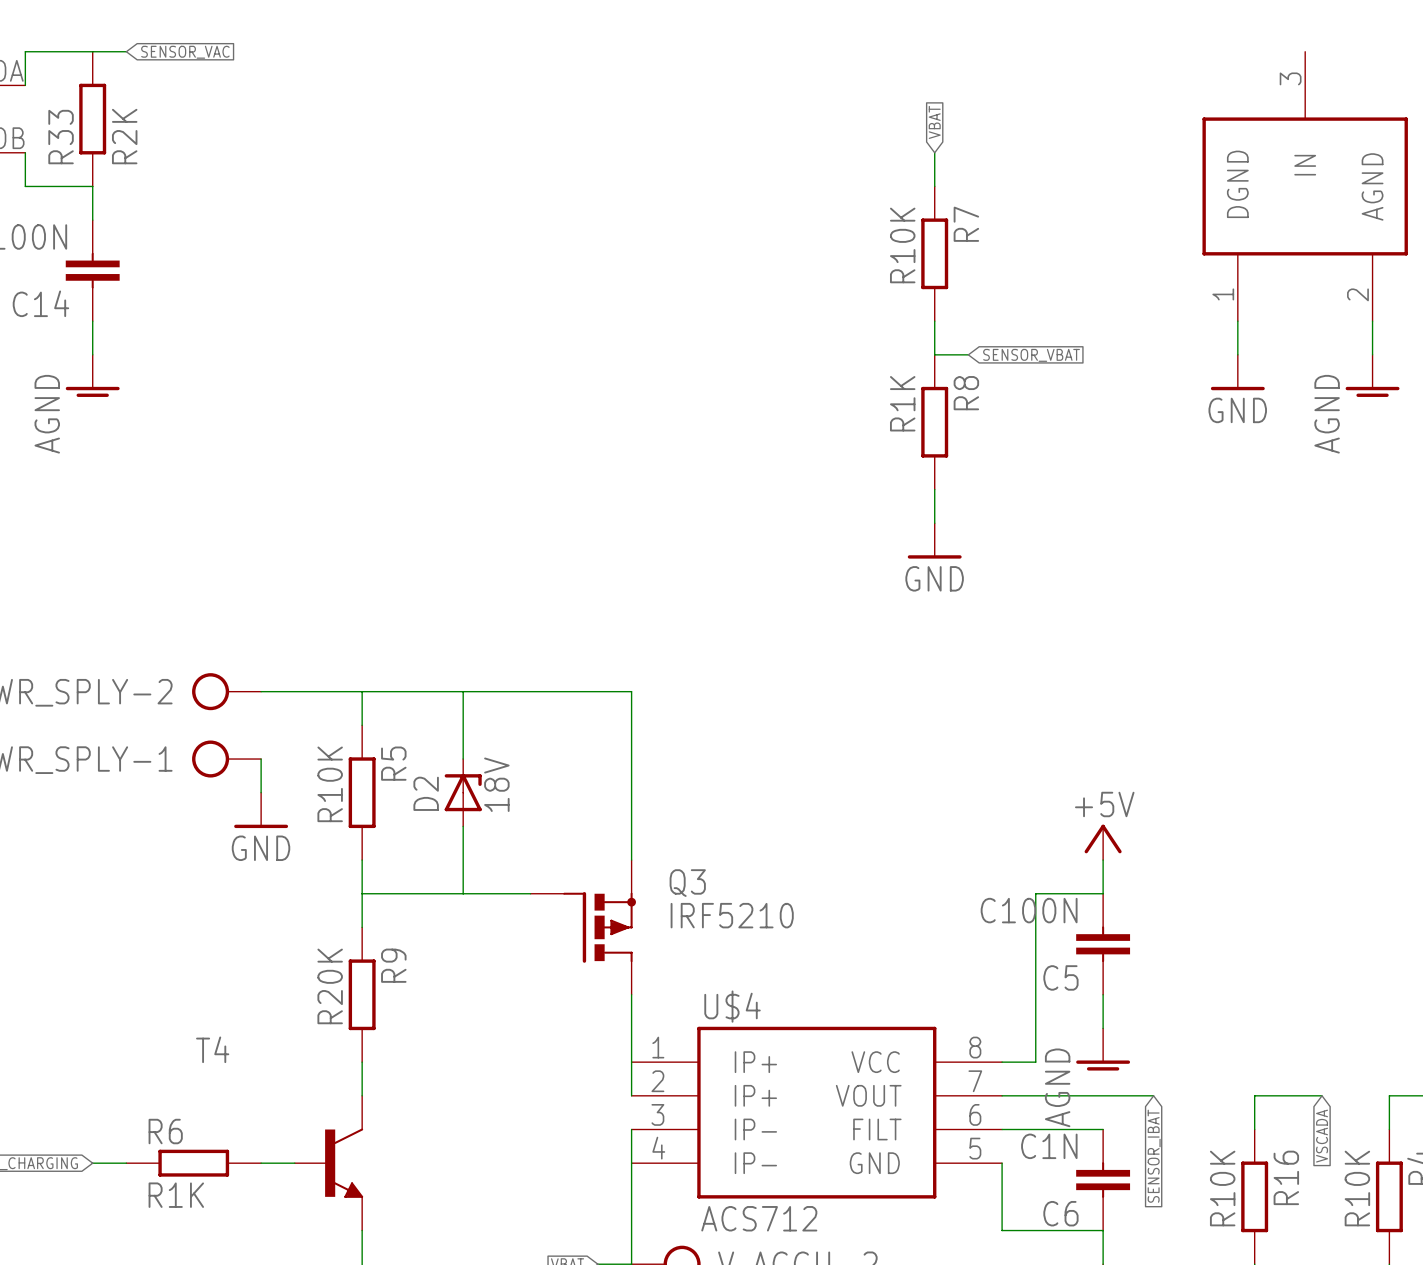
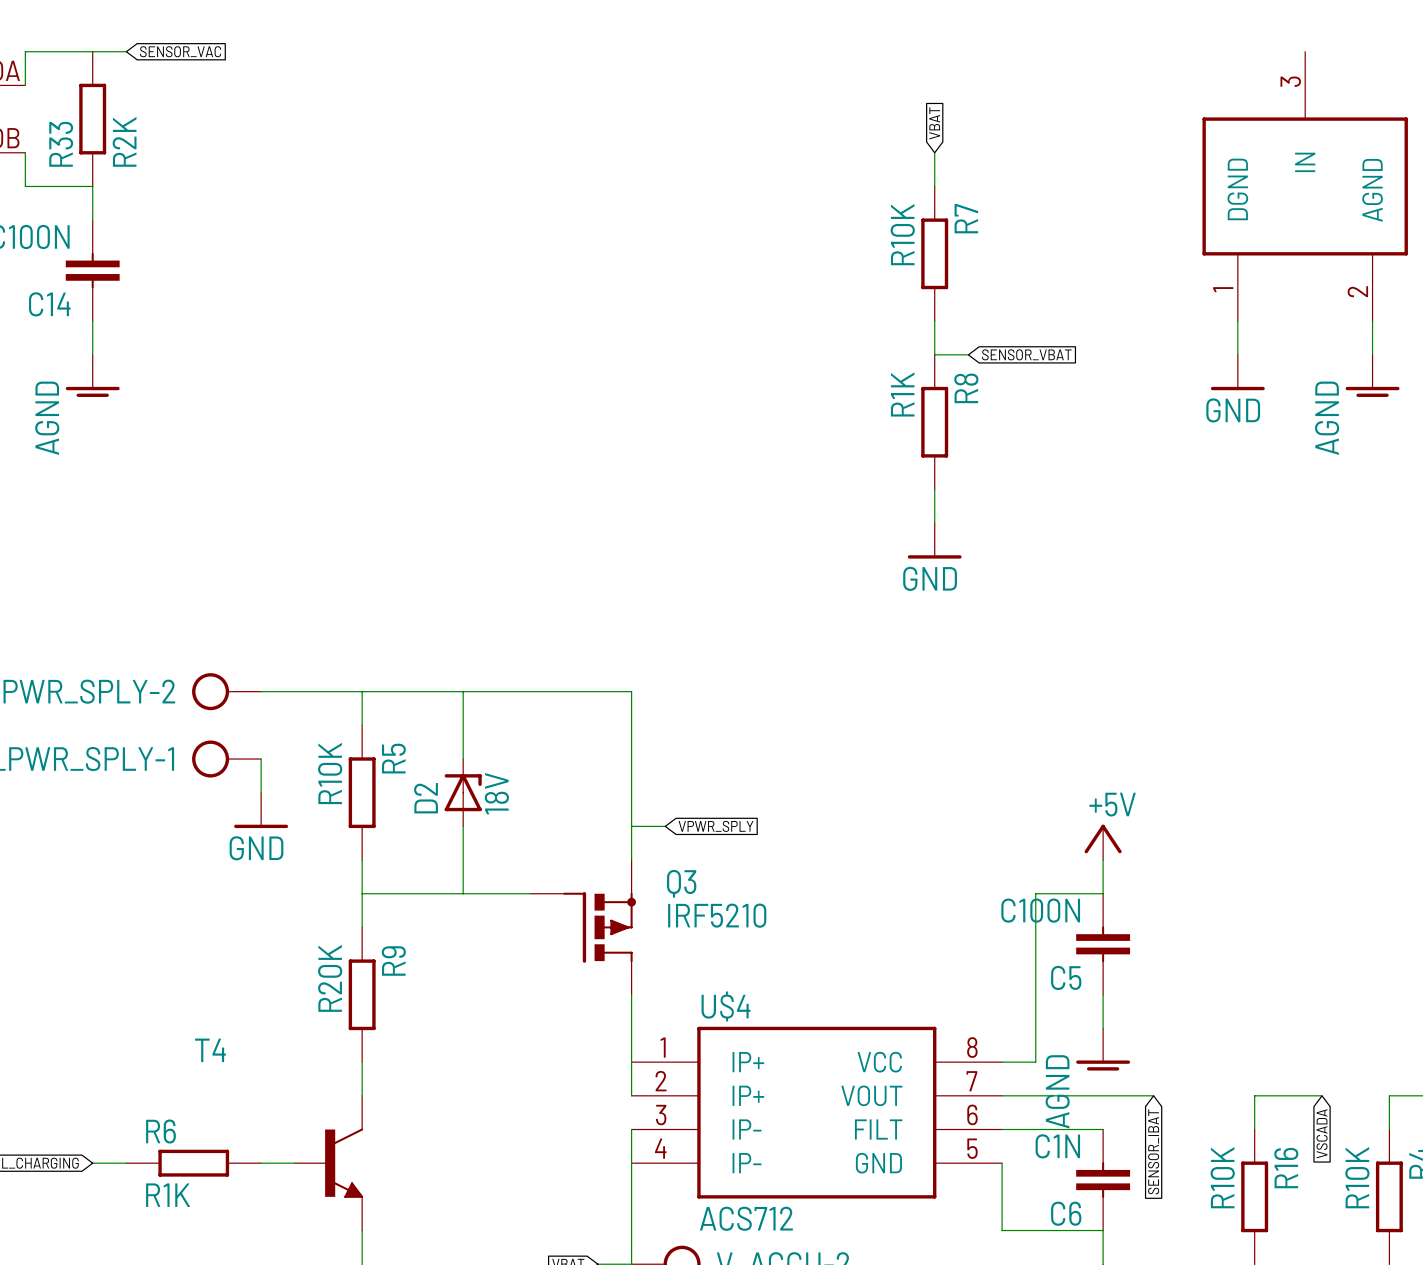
wire: none -> (631, 826) (665, 826)
global label: none -> VPWR_SPLY (716, 826)

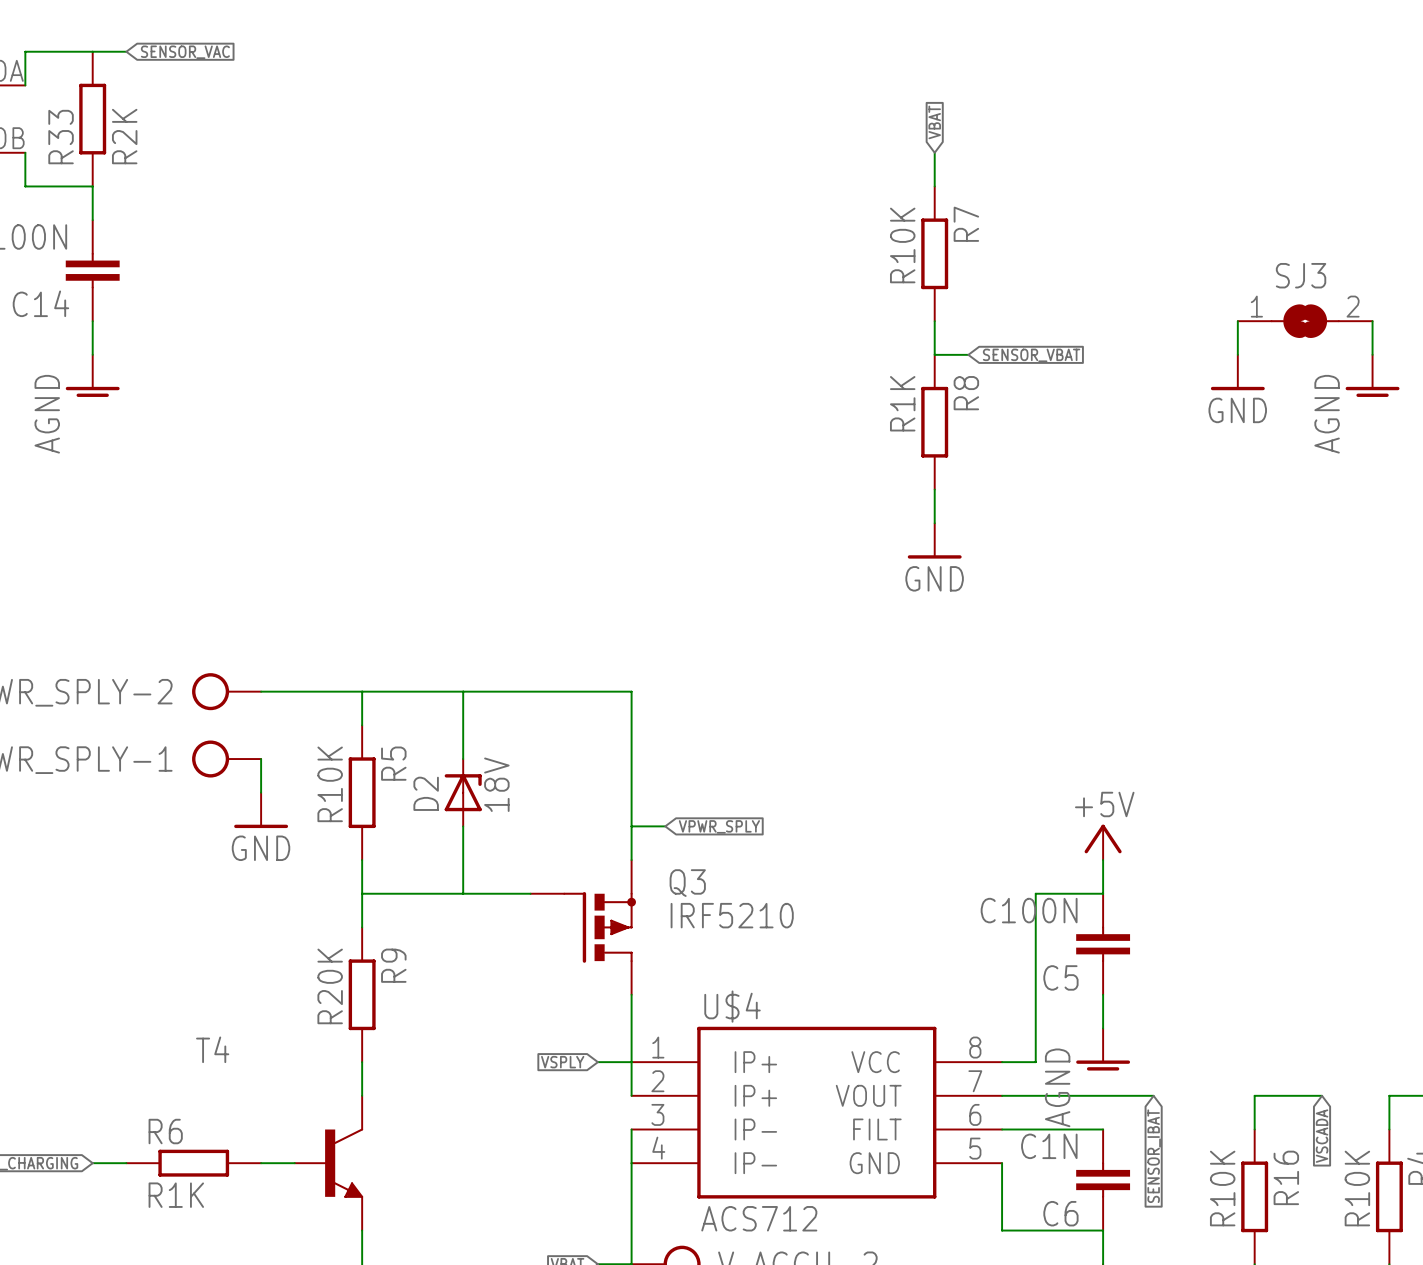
part: (1305, 186) -> none
SJ3: none -> (1305, 321)
global label: none -> VSPLY (562, 1062)
wire: none -> (597, 1062) (631, 1062)

